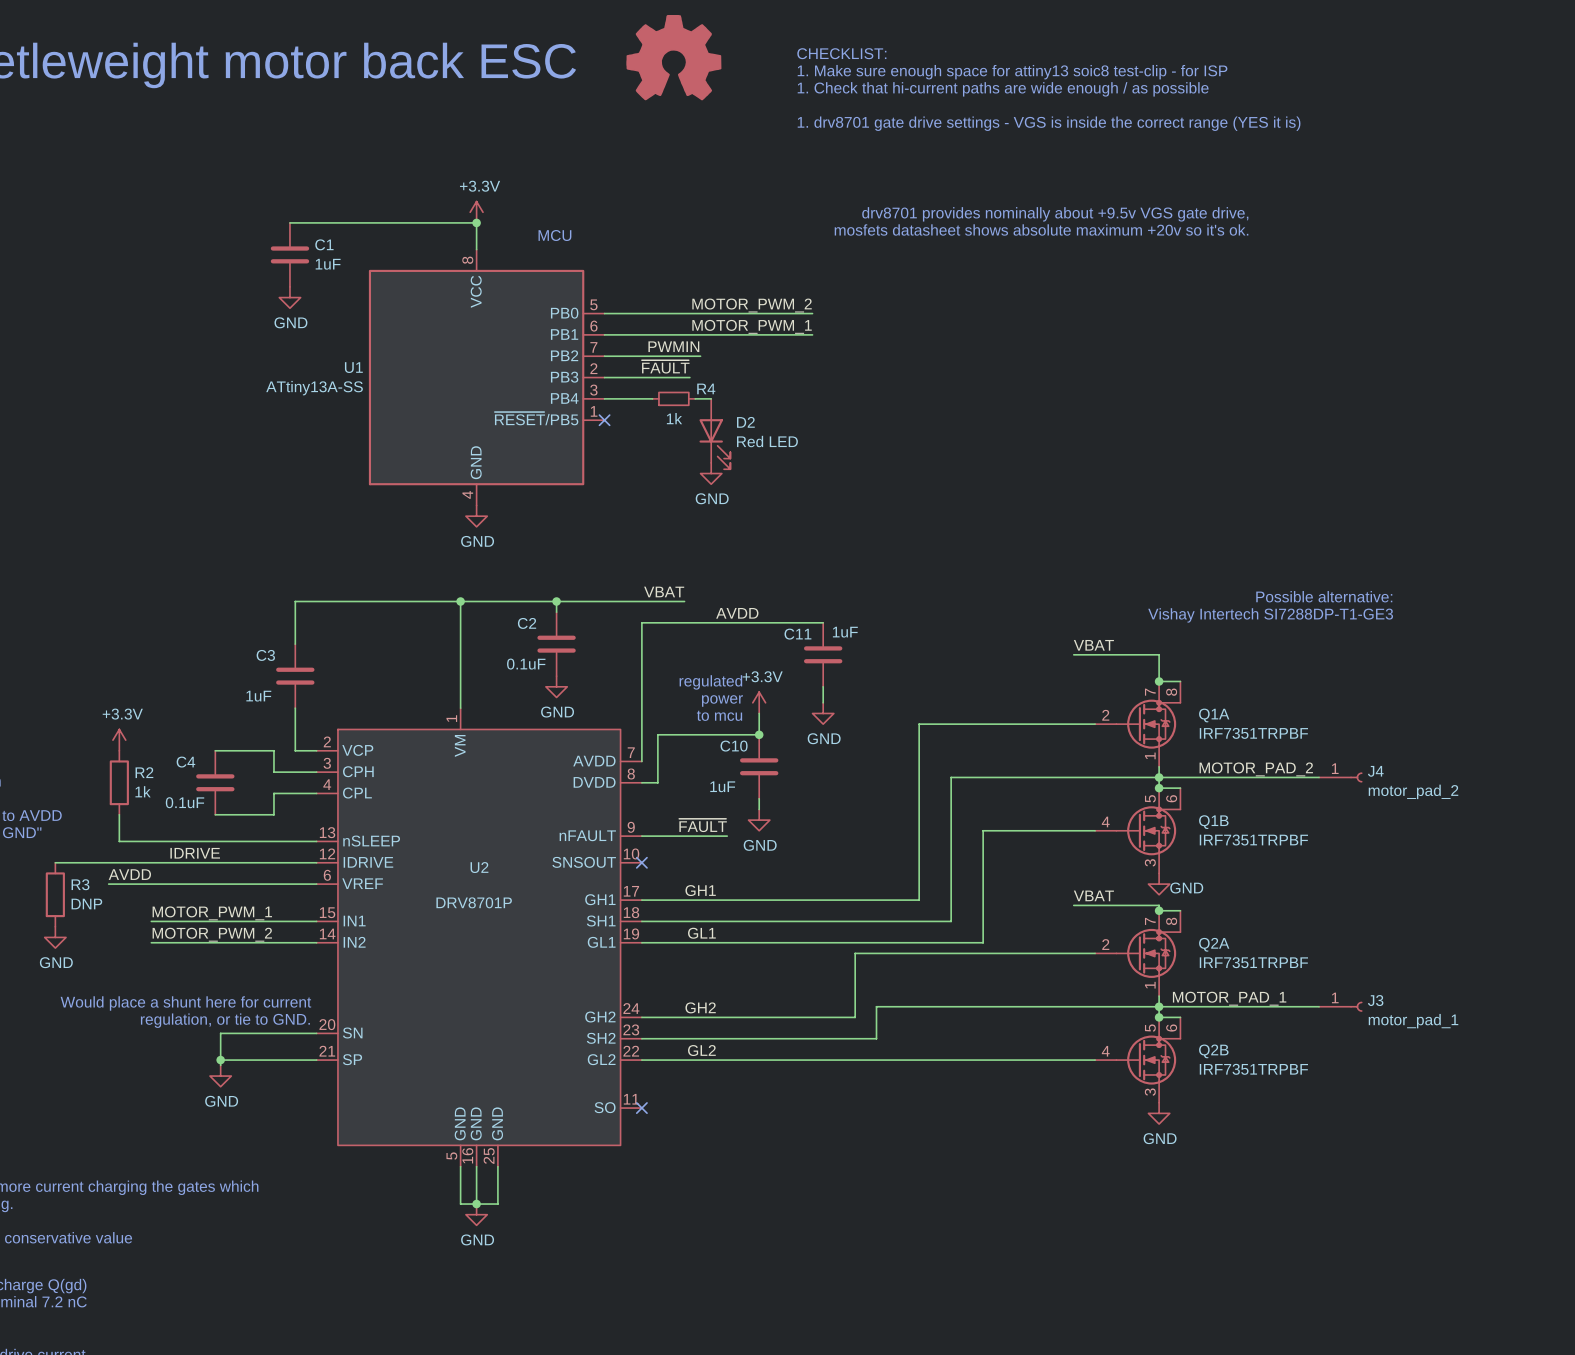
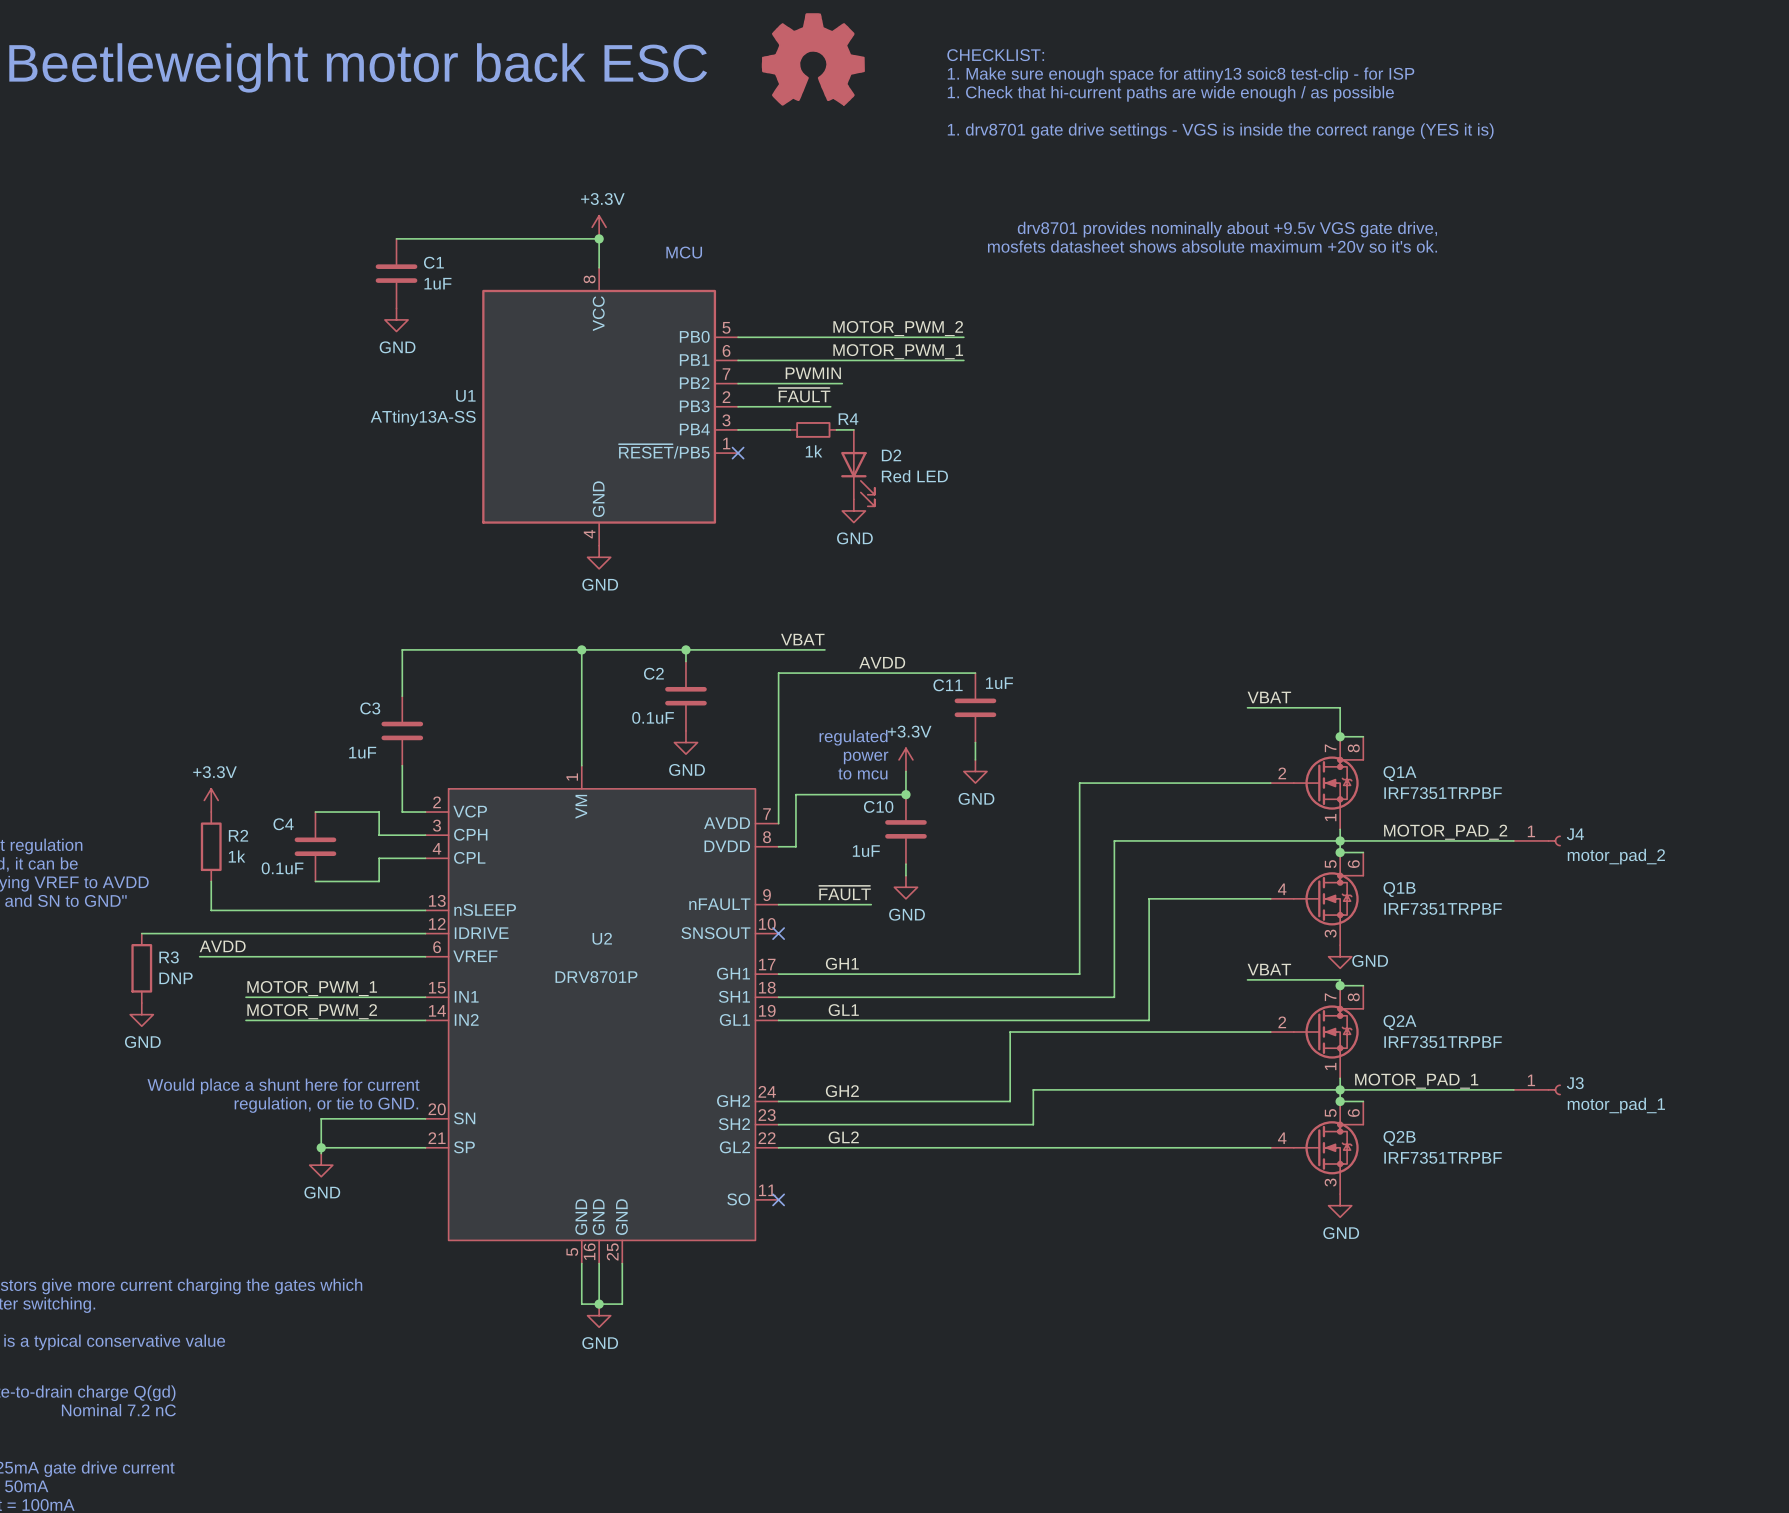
text: Possible alternative: (1324, 596) -> none
text: Vishay Intertech SI7288DP-T1-GE3 (1270, 615) -> none
label: IDRIVE (195, 853) -> none

